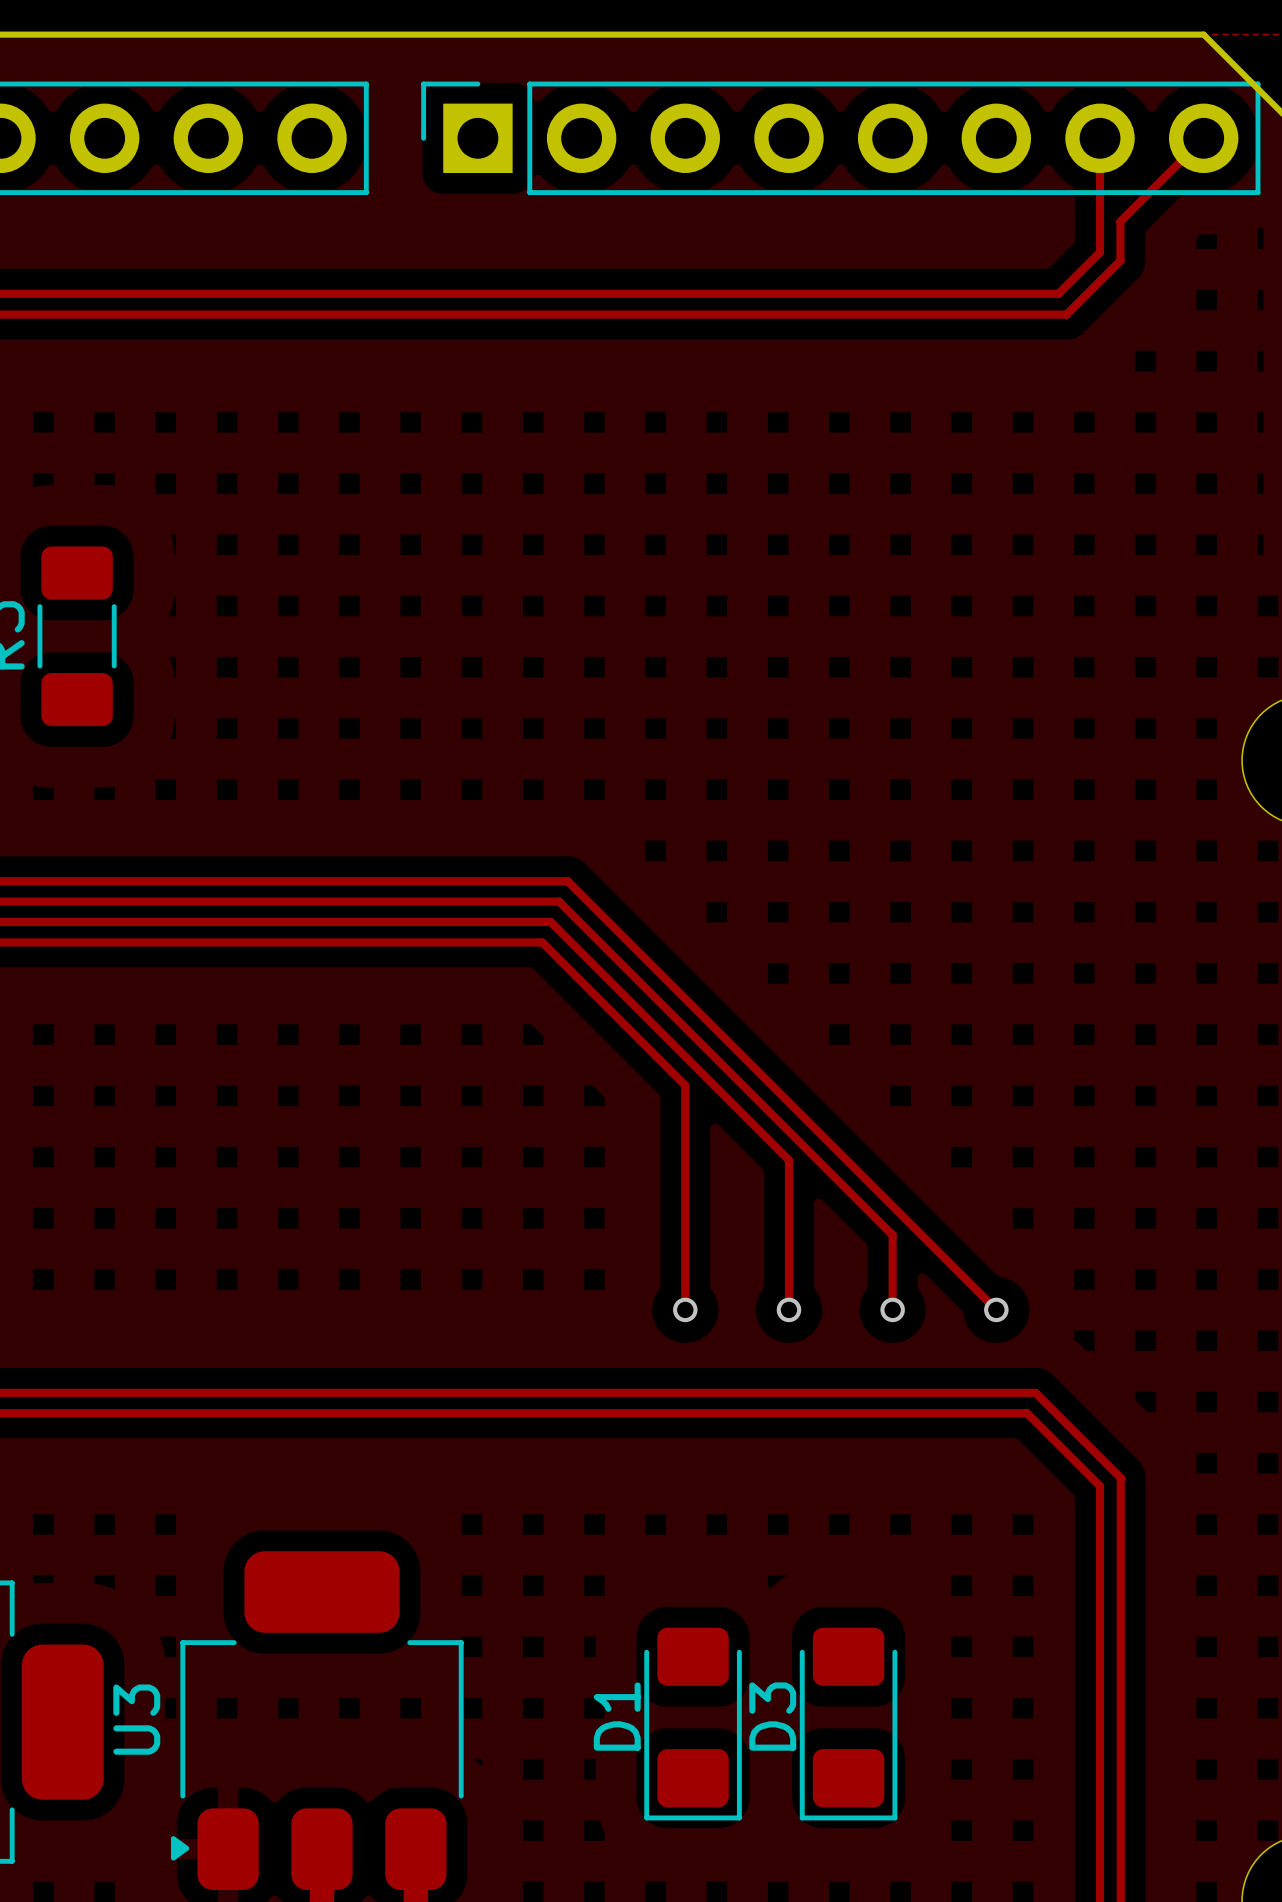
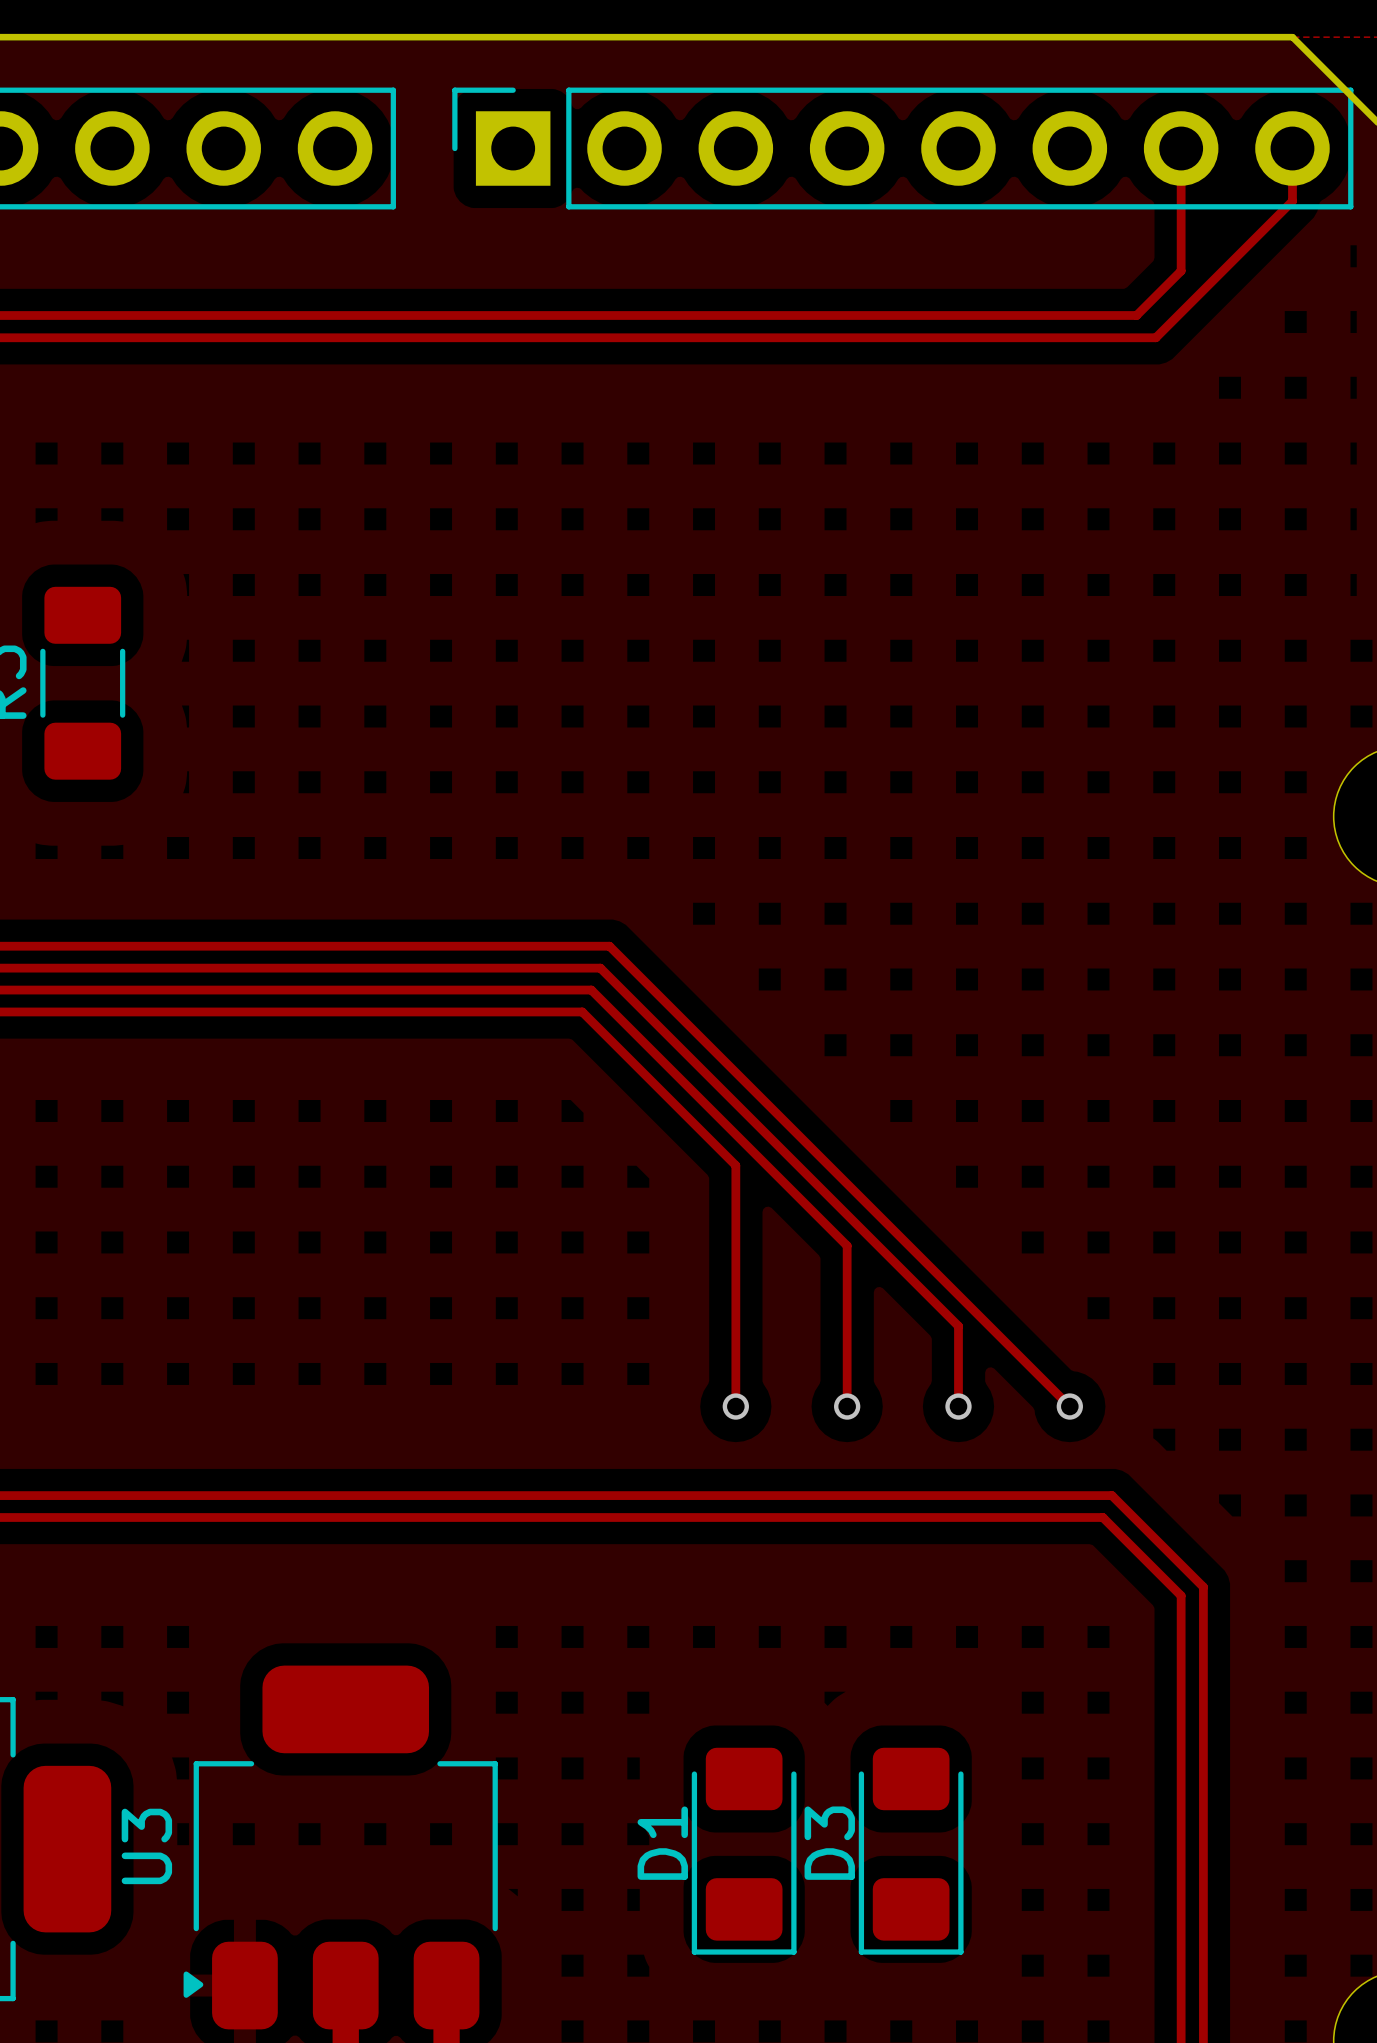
track: (1203, 138) (1120, 221) (1120, 260) (1066, 314) -> (1292, 148) (1292, 201) (1155, 337) (1145, 337)

